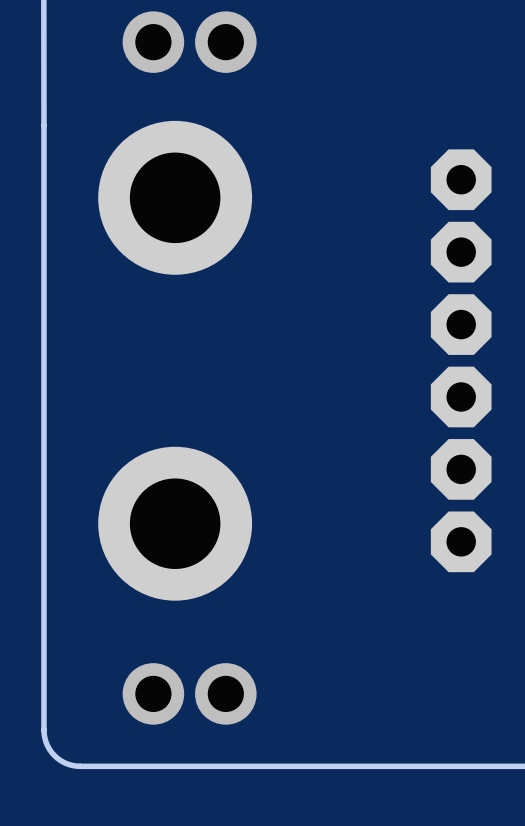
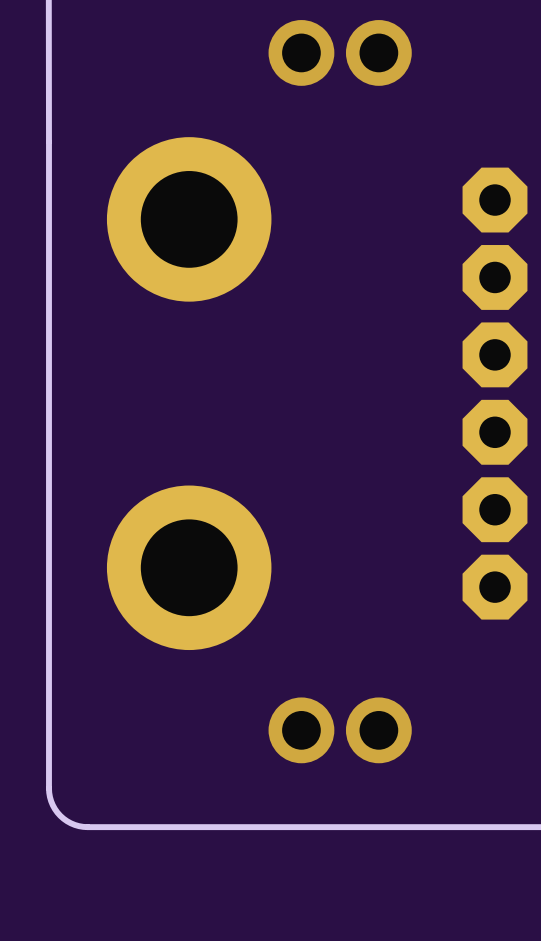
via: (153, 42) -> none
via position: (225, 42) -> (301, 52)
via: none -> (378, 52)
via: none -> (378, 730)
via: (153, 693) -> none
via position: (225, 693) -> (301, 730)

